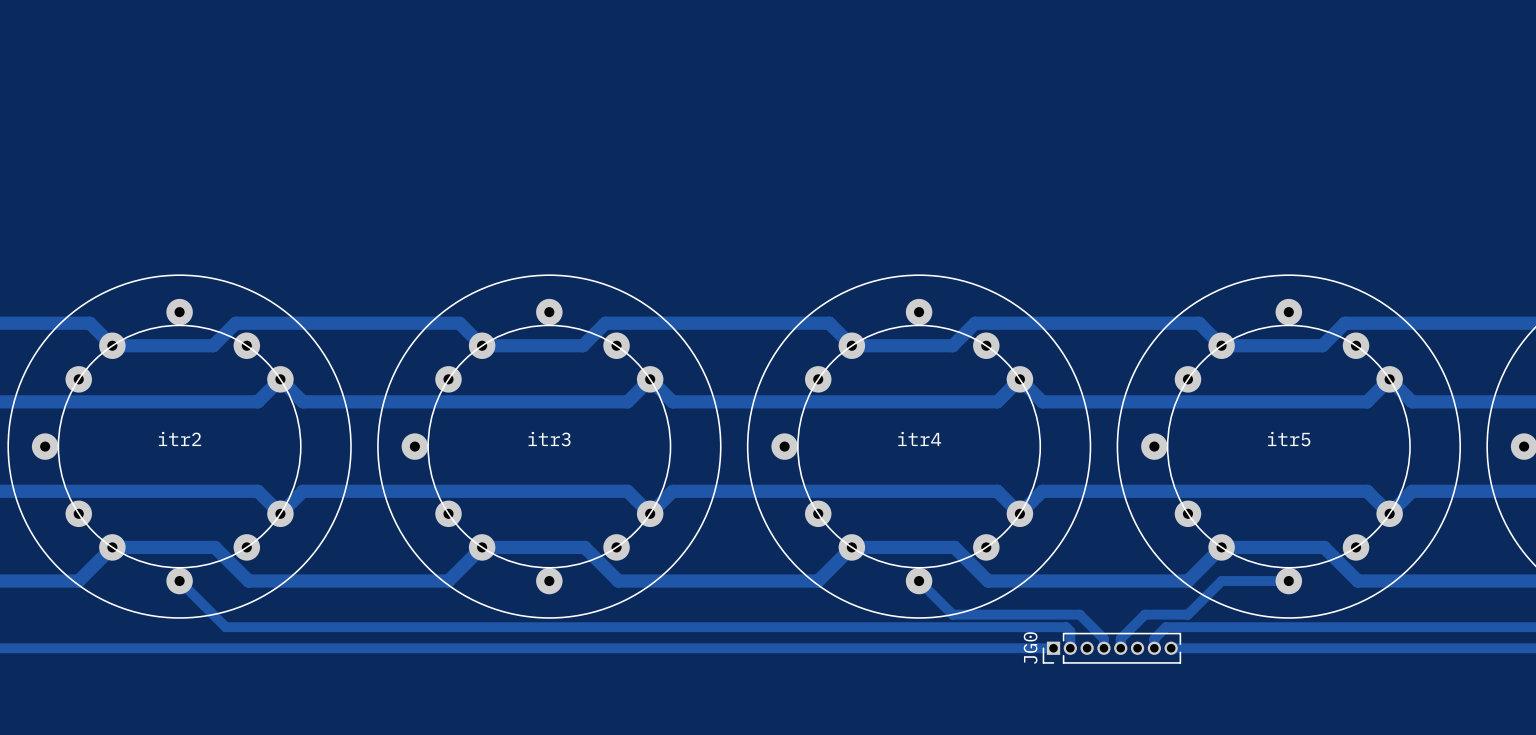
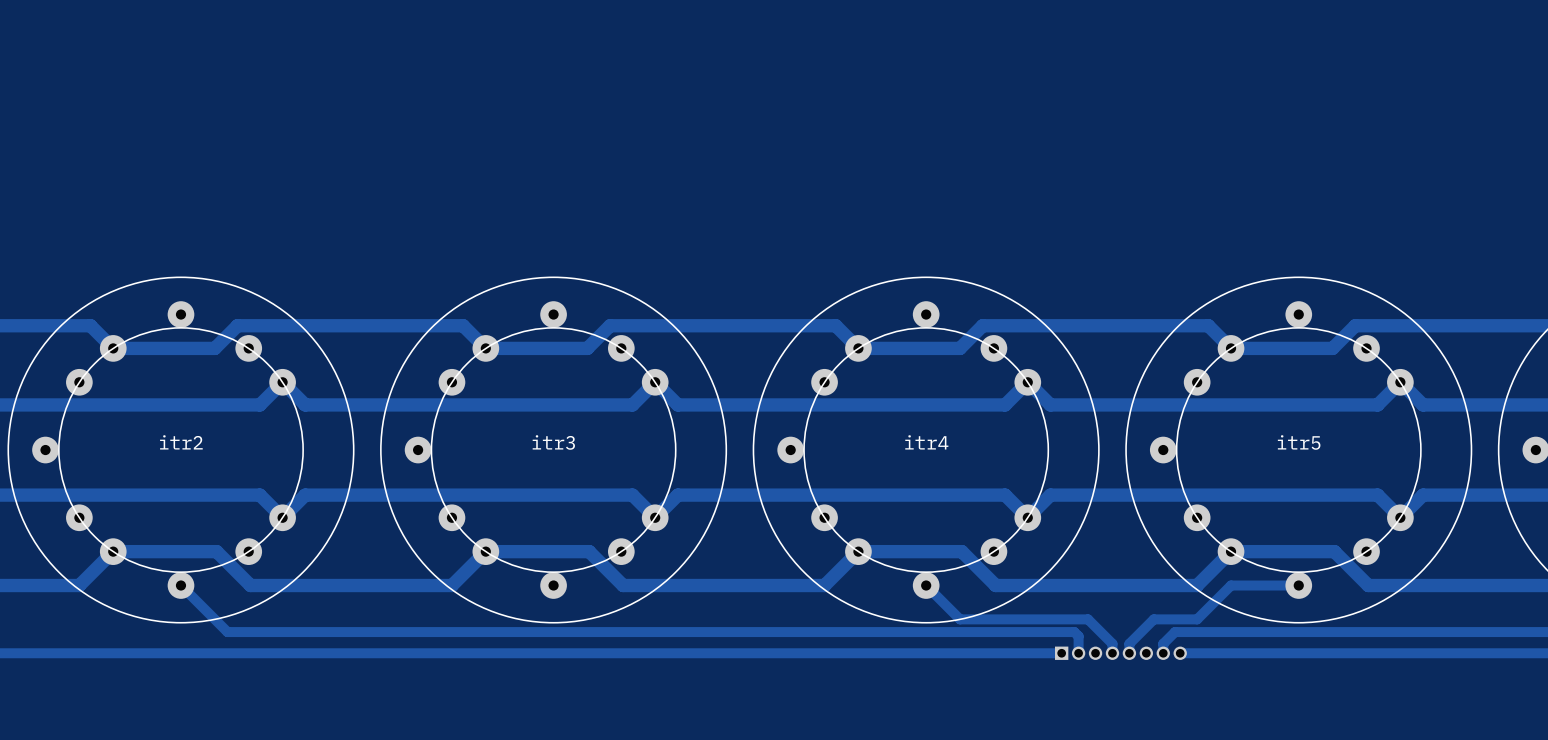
JG0 side: top (1111, 648) -> bottom (1120, 653)

